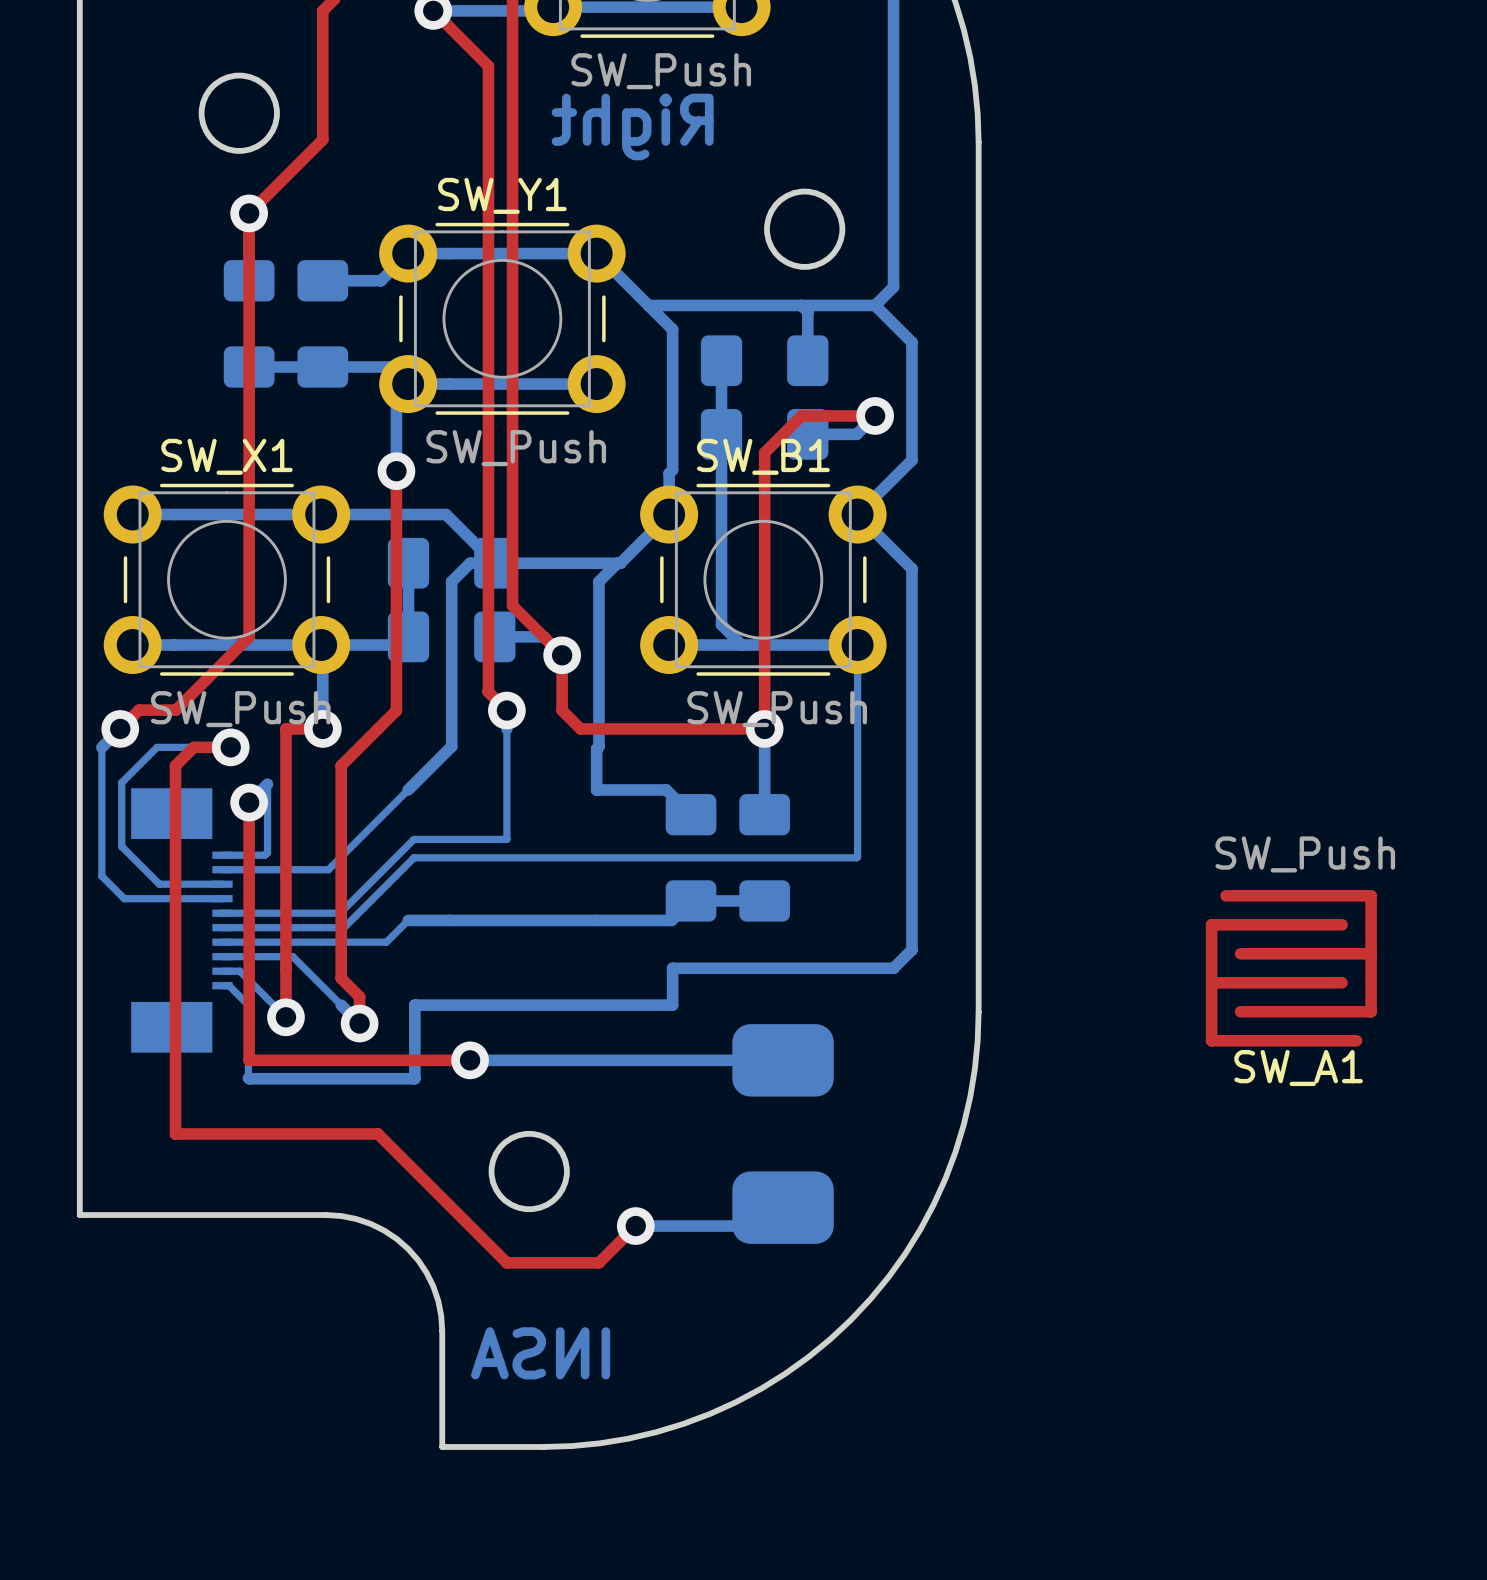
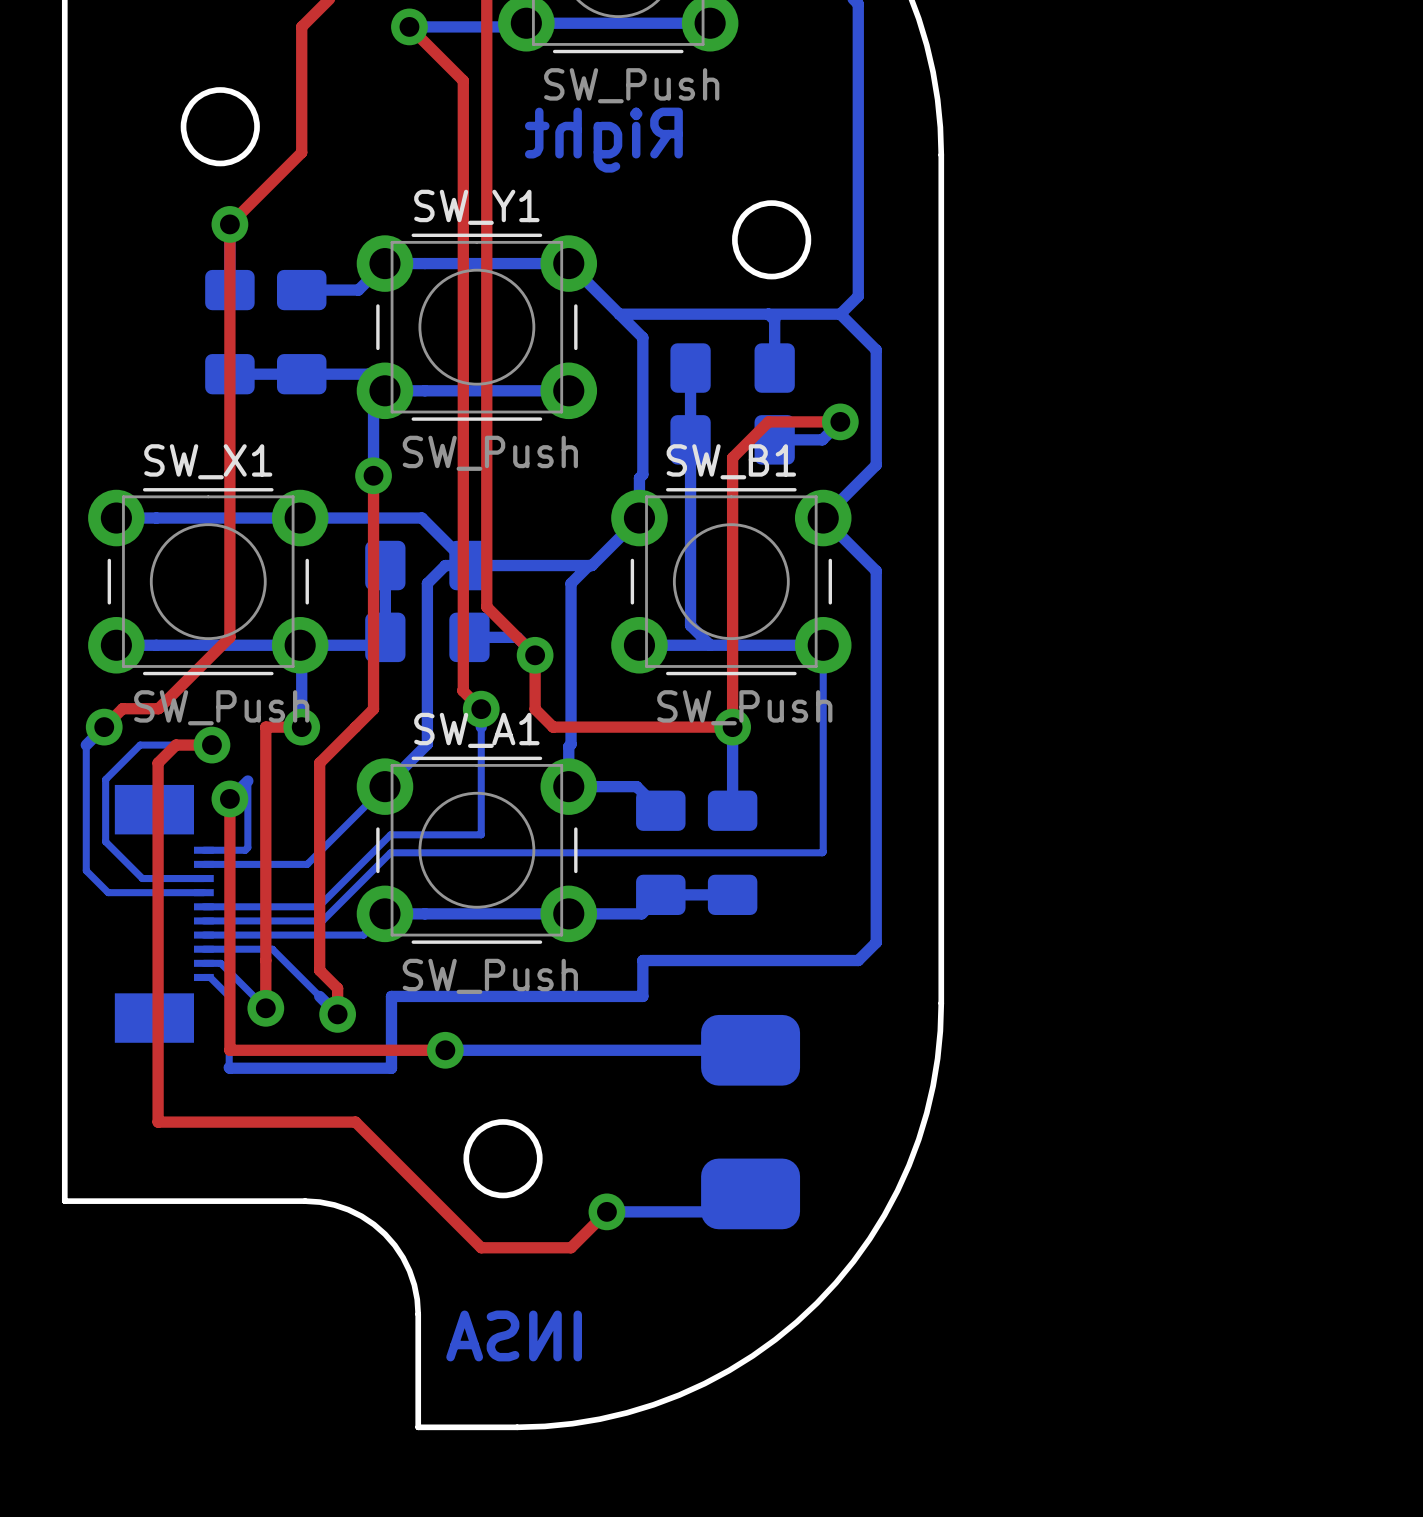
SW_A1 value position: SW_Push (1305, 854) -> SW_Push (490, 976)
SW_A1 footprint: [1205, 890, 1377, 1047] -> [356, 756, 598, 944]
SW_A1 name position: SW_A1 (1298, 1068) -> SW_A1 (476, 730)

